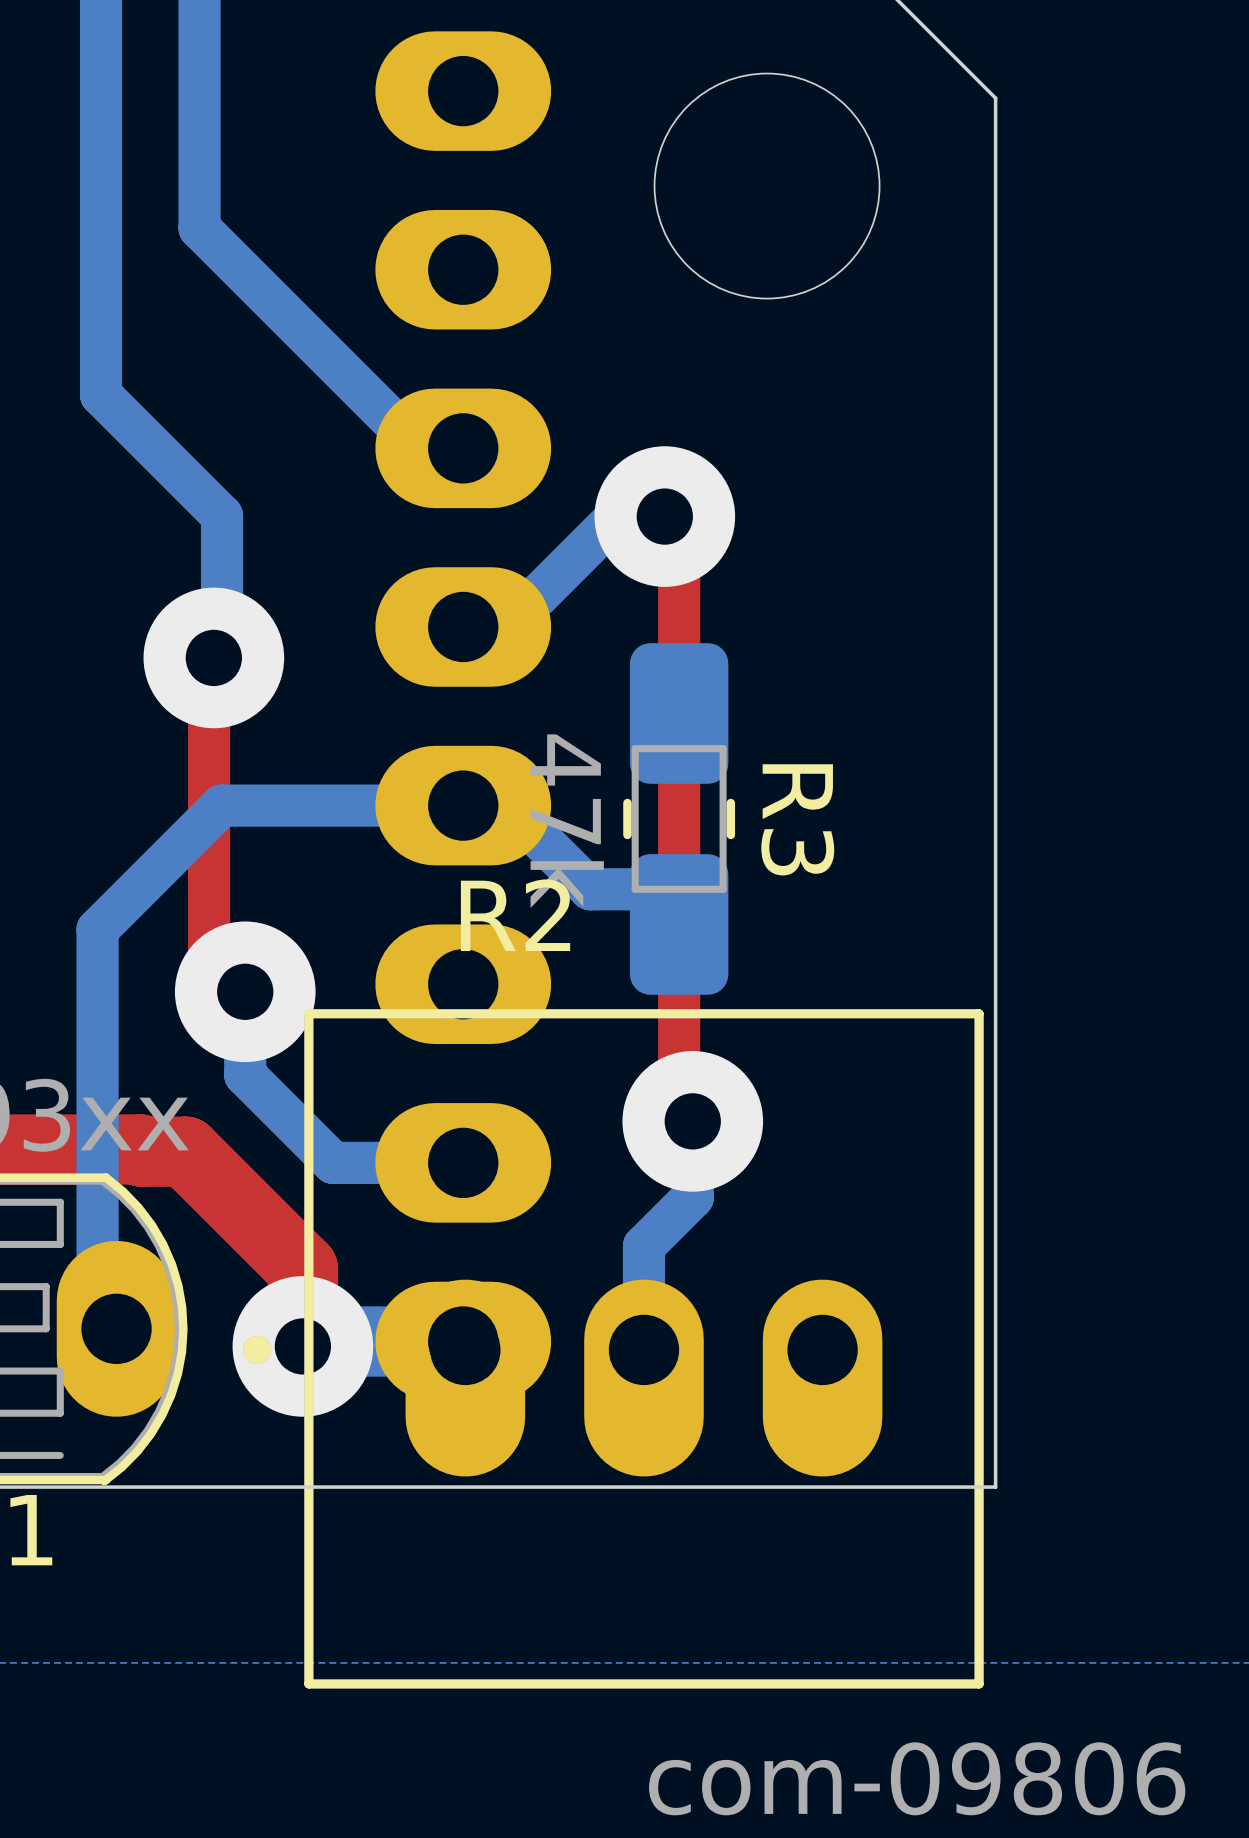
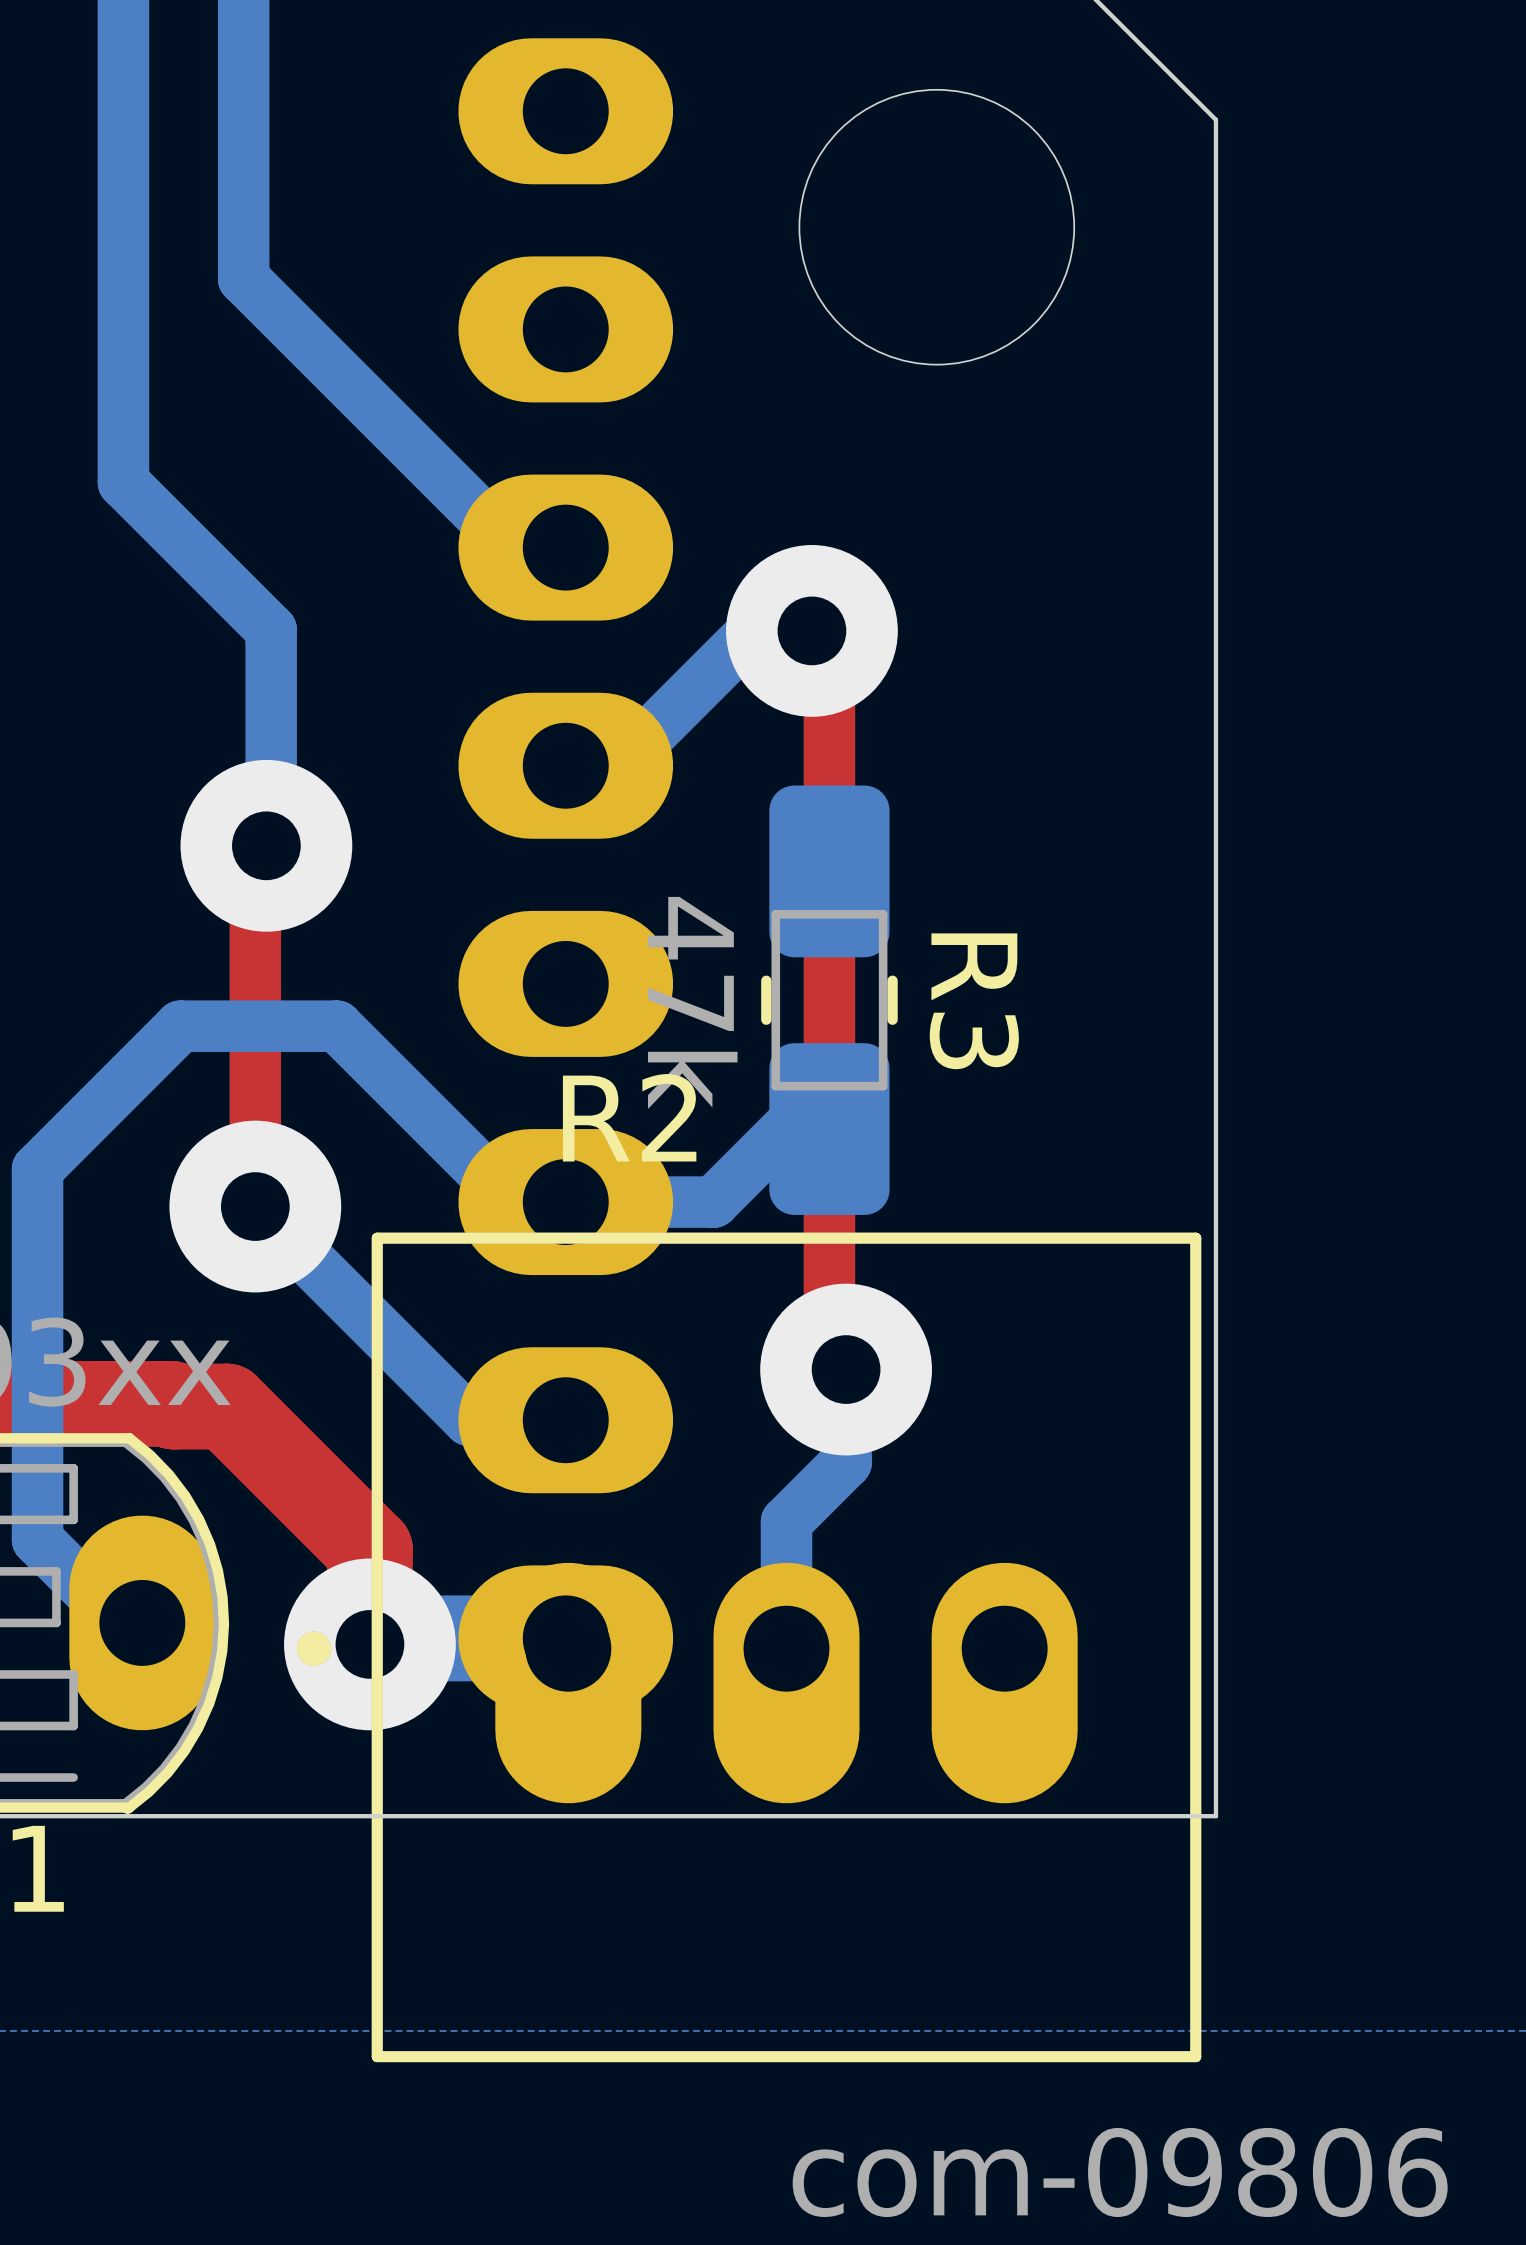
via position: (213, 657) -> (266, 845)
bottom track: (679, 889) (590, 889) (506, 805) (221, 805) (97, 929) (97, 1309) (116, 1328) -> (829, 1086) (713, 1202) (512, 1202) (336, 1026) (180, 1026) (37, 1169) (37, 1539) (142, 1644)
bottom track: (245, 991) (245, 1074) (333, 1162) (384, 1162) -> (255, 1206) (469, 1420)
via position: (245, 991) -> (255, 1206)

